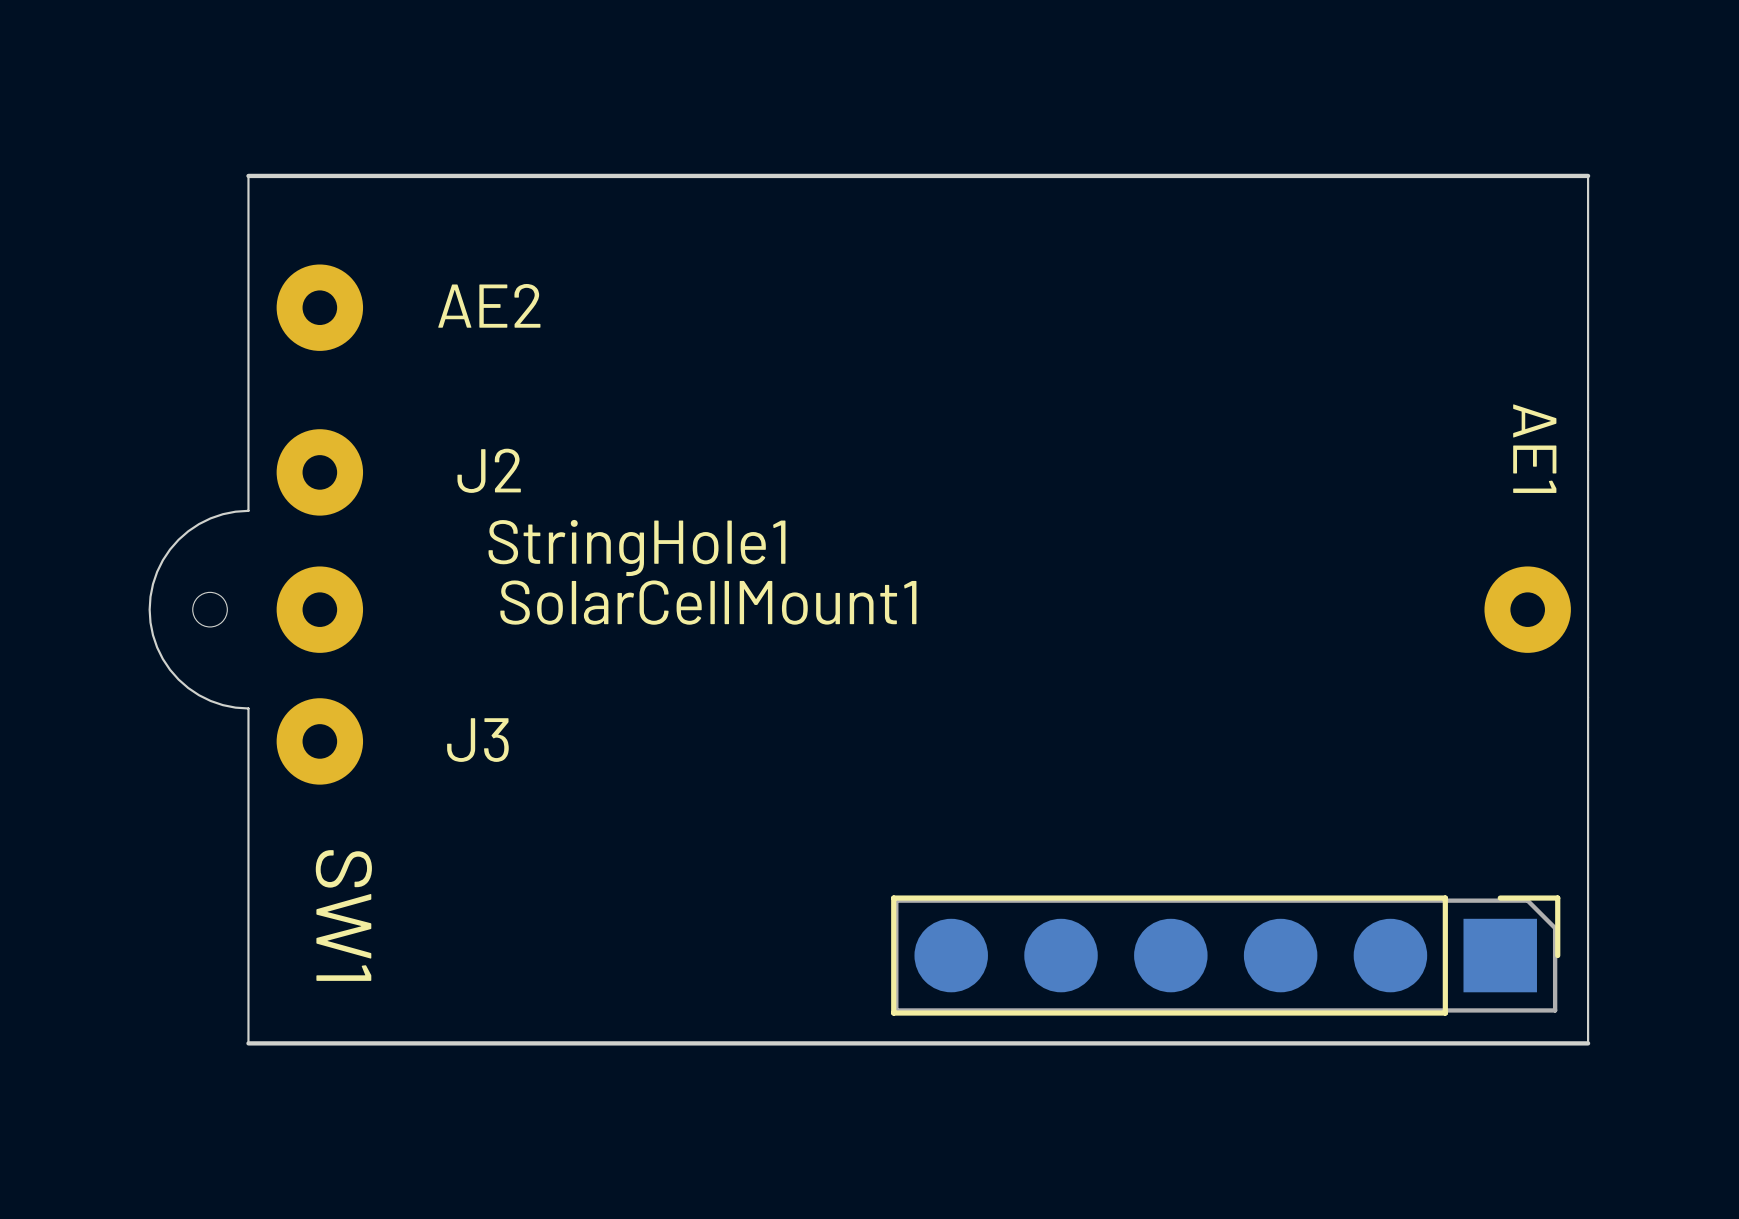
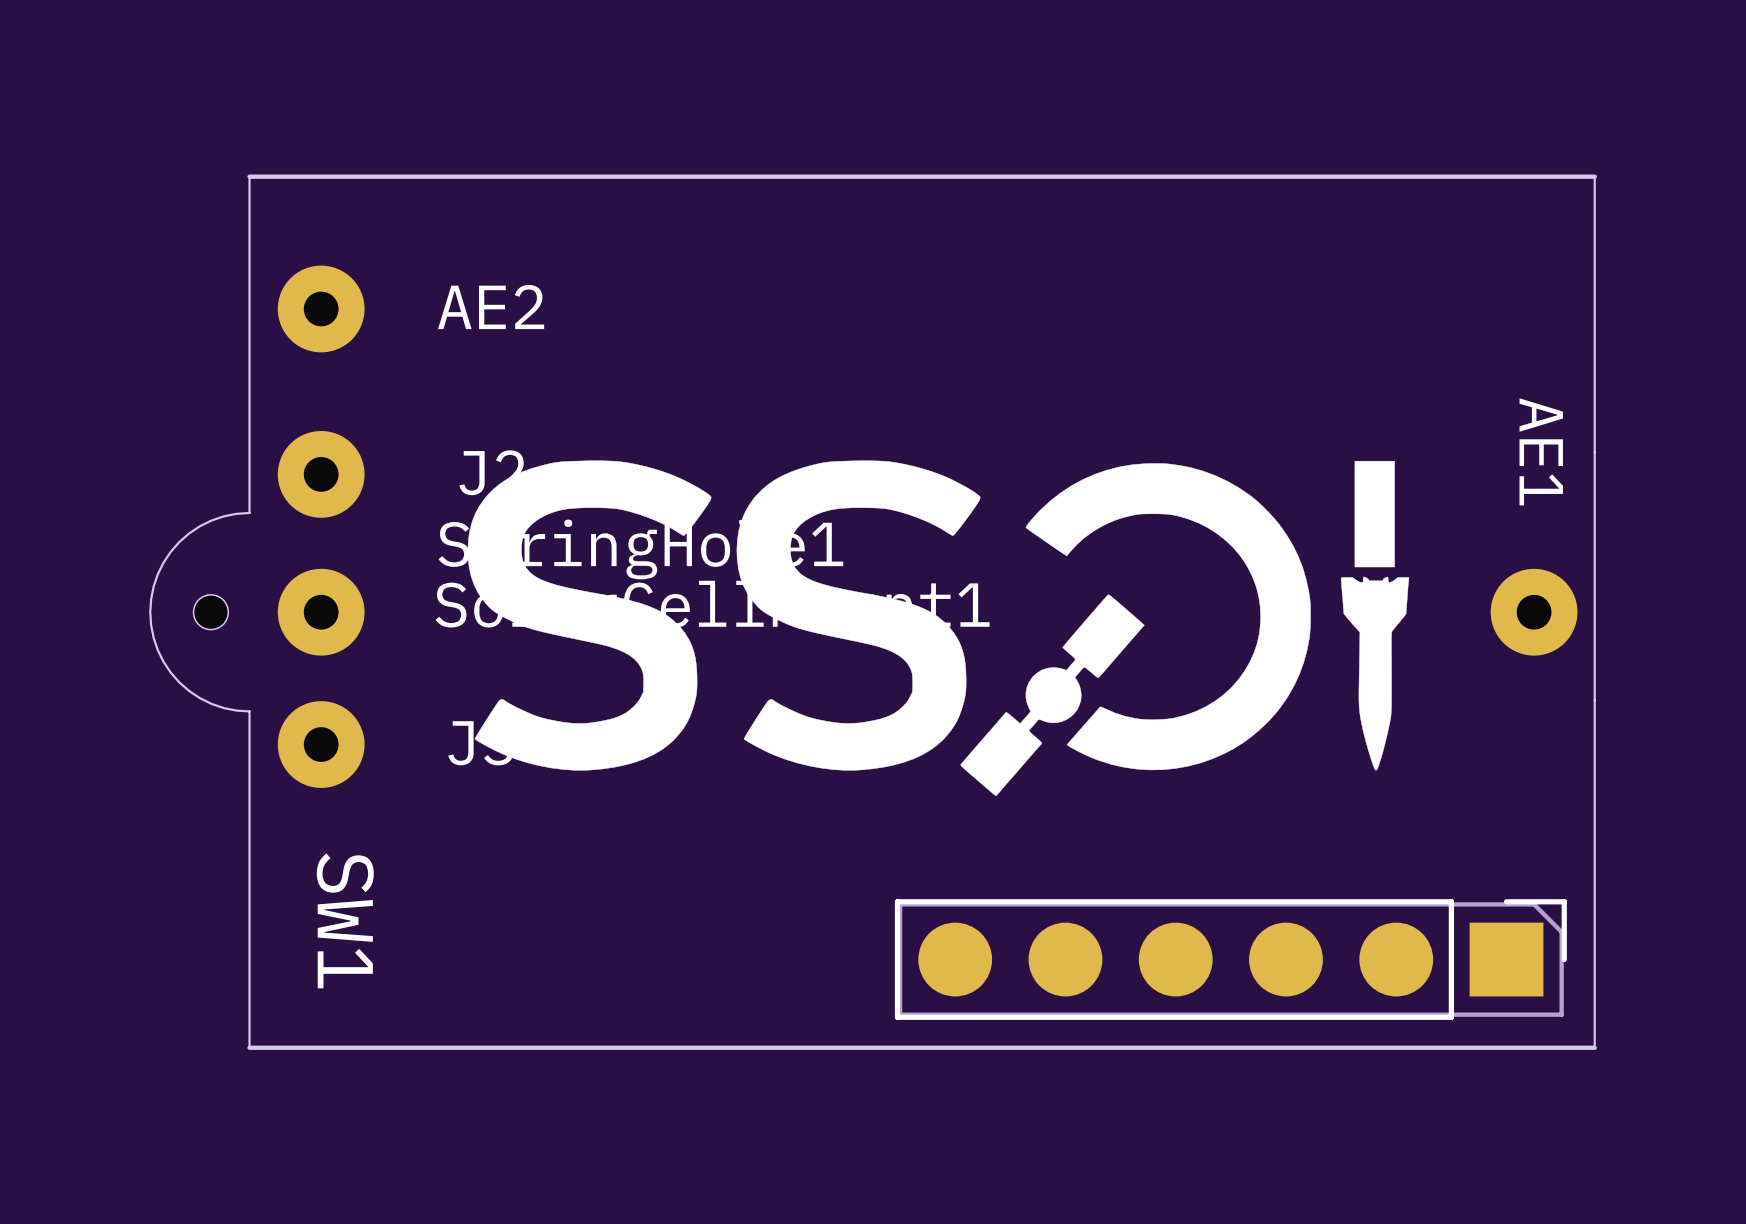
drawing: none -> [467, 460, 1410, 797]

